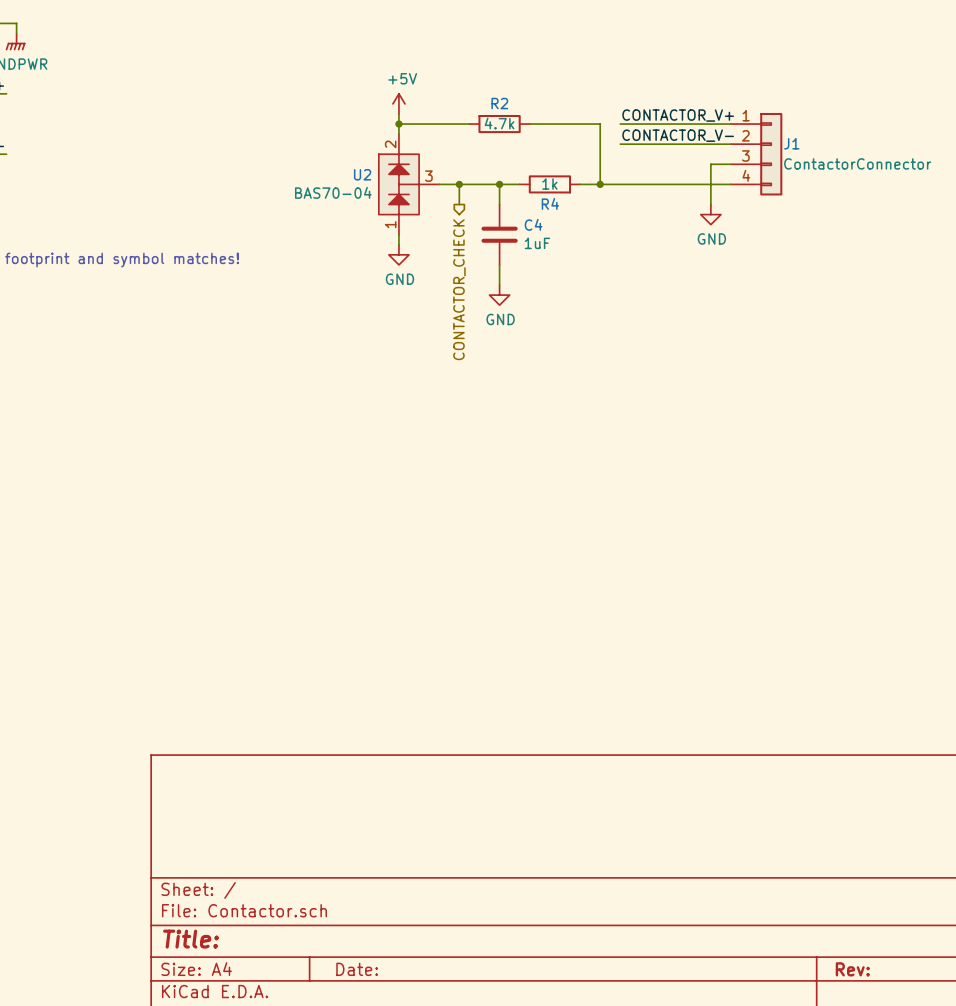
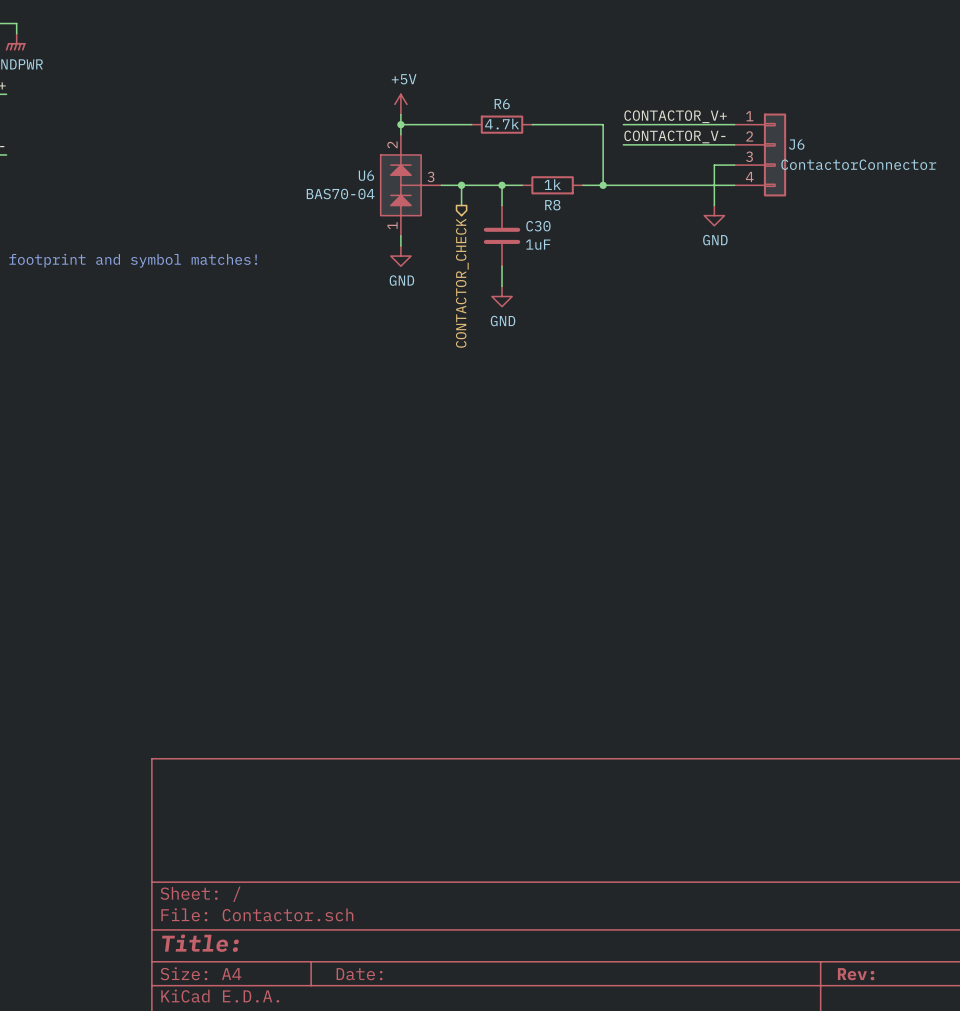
R2 name: R2 (499, 103) -> R6 (502, 104)
J1 name: J1 (791, 143) -> J6 (796, 144)
U2 name: U2 (362, 174) -> U6 (366, 175)
R4 name: R4 (550, 203) -> R8 (552, 205)
C4 name: C4 (533, 224) -> C30 (538, 226)

